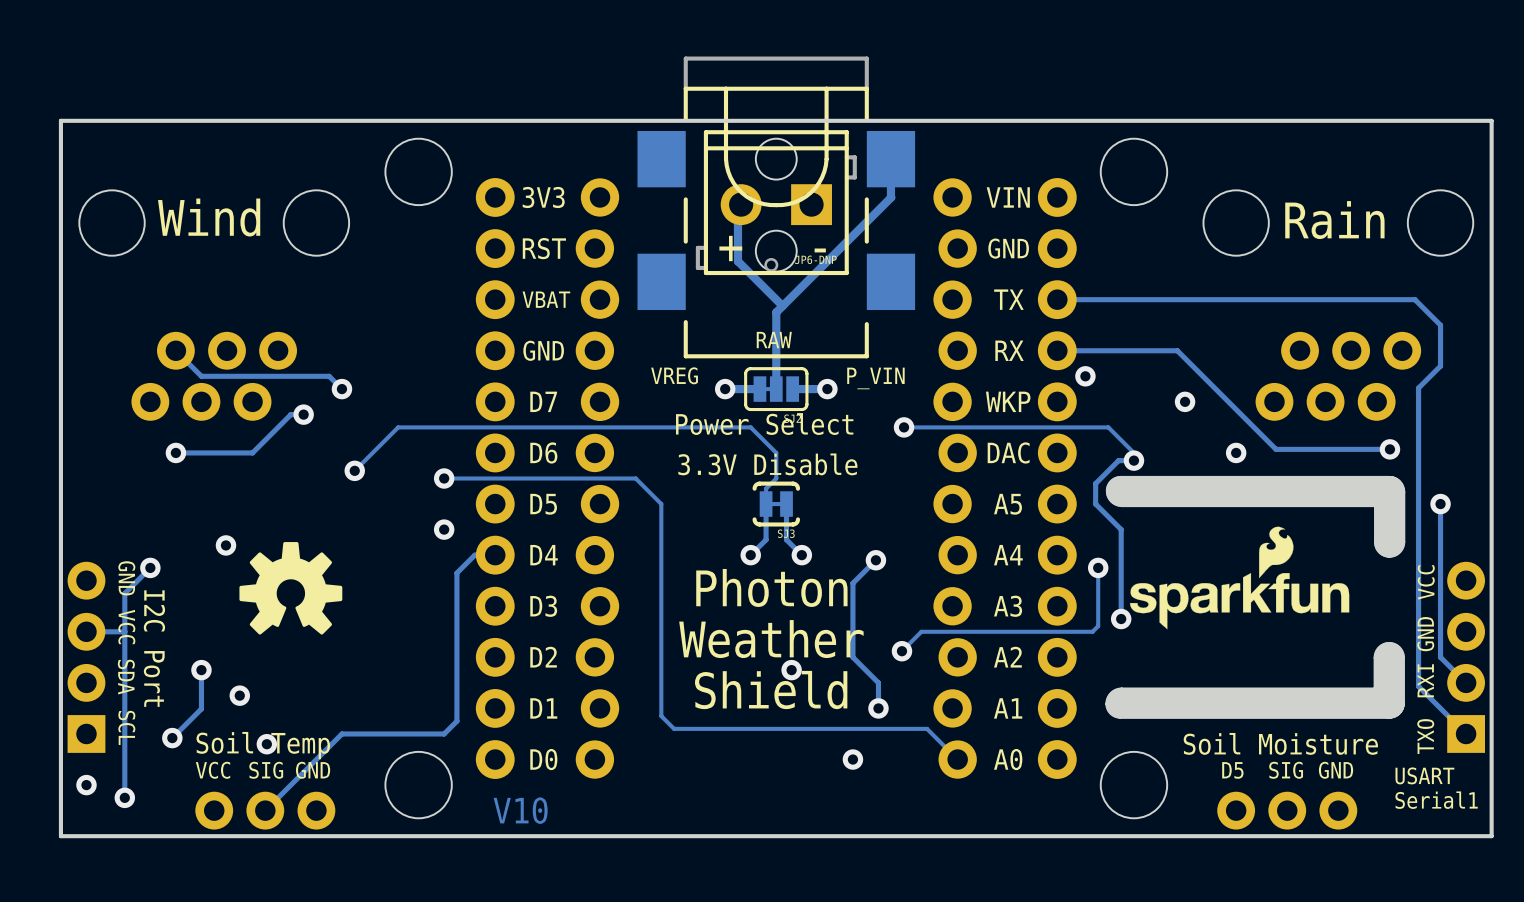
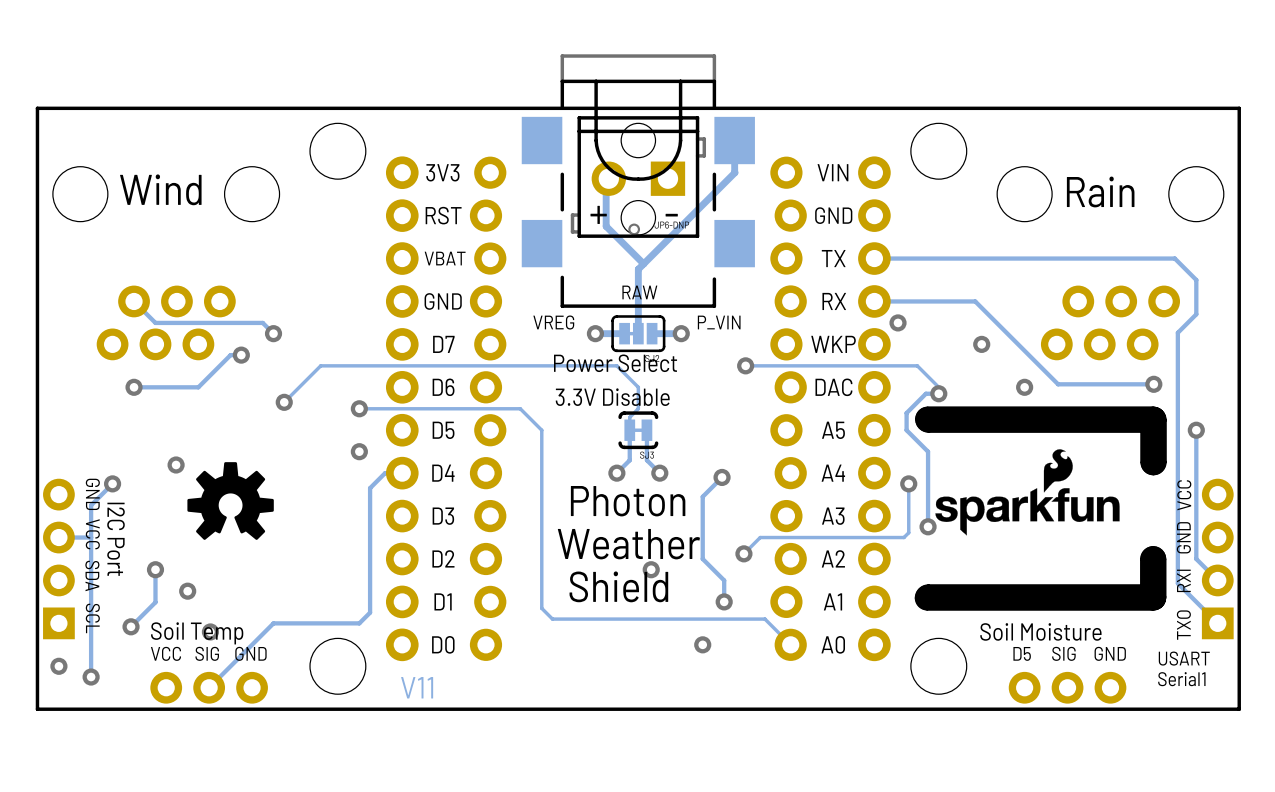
text: V10 (520, 810) -> V11 (417, 687)

